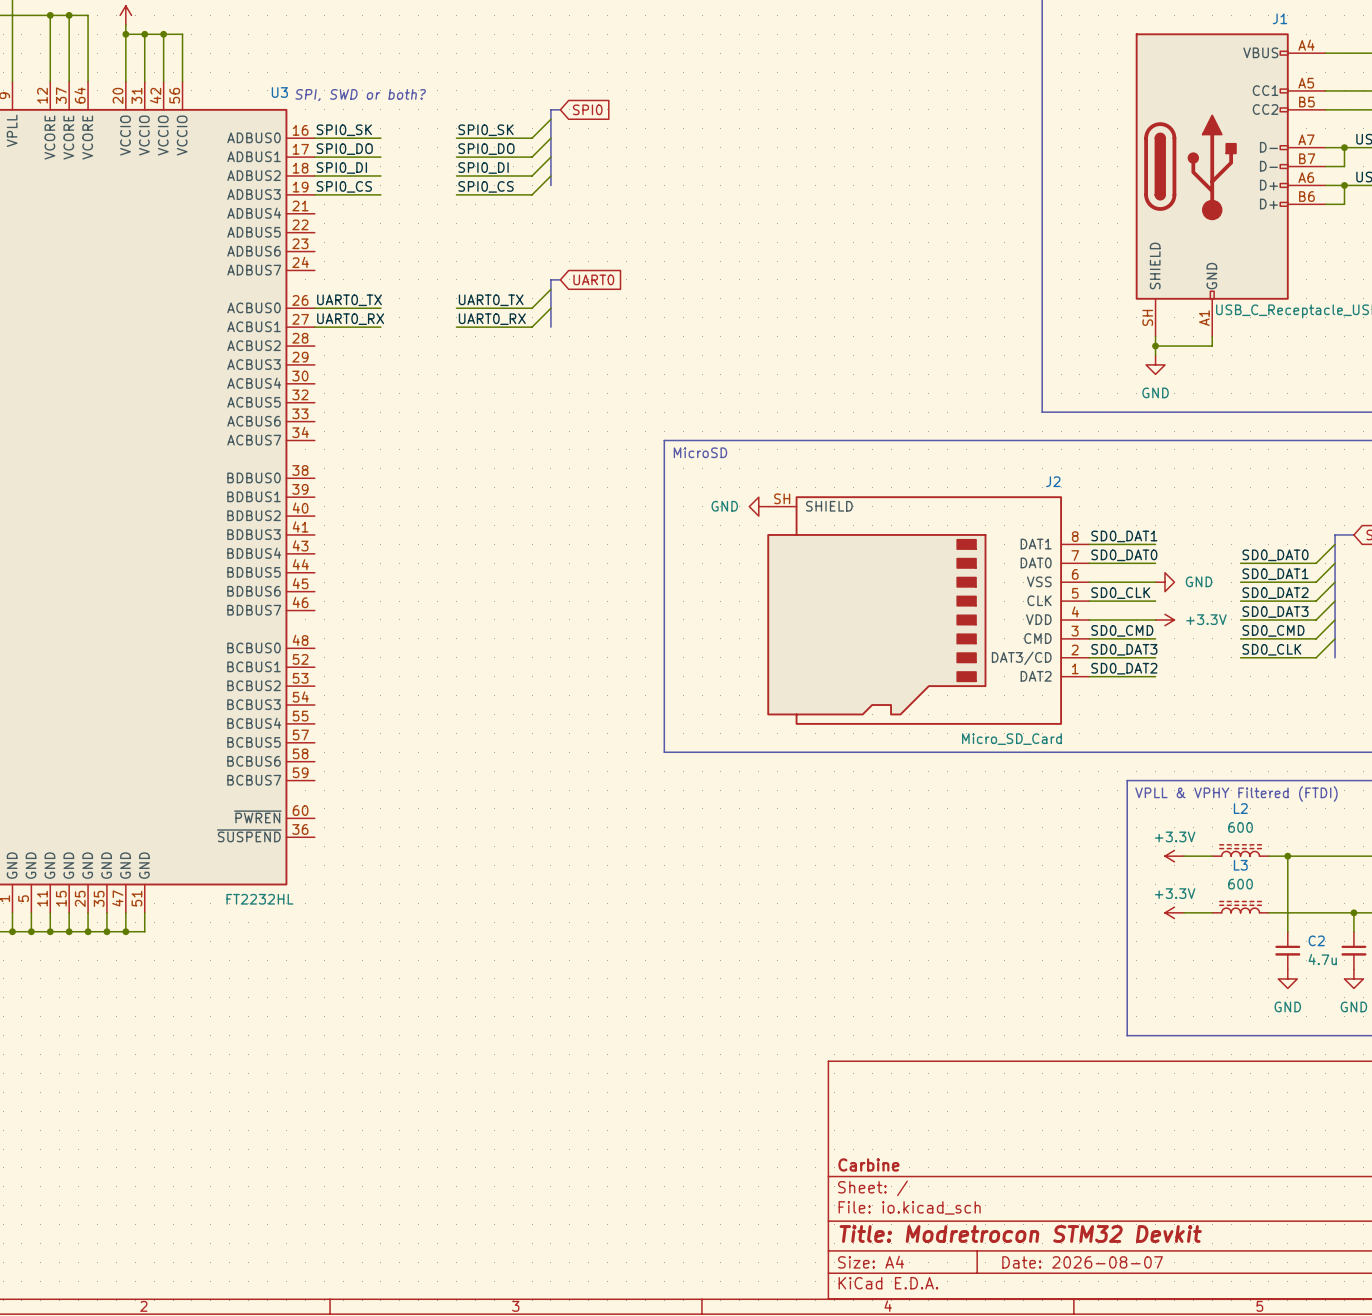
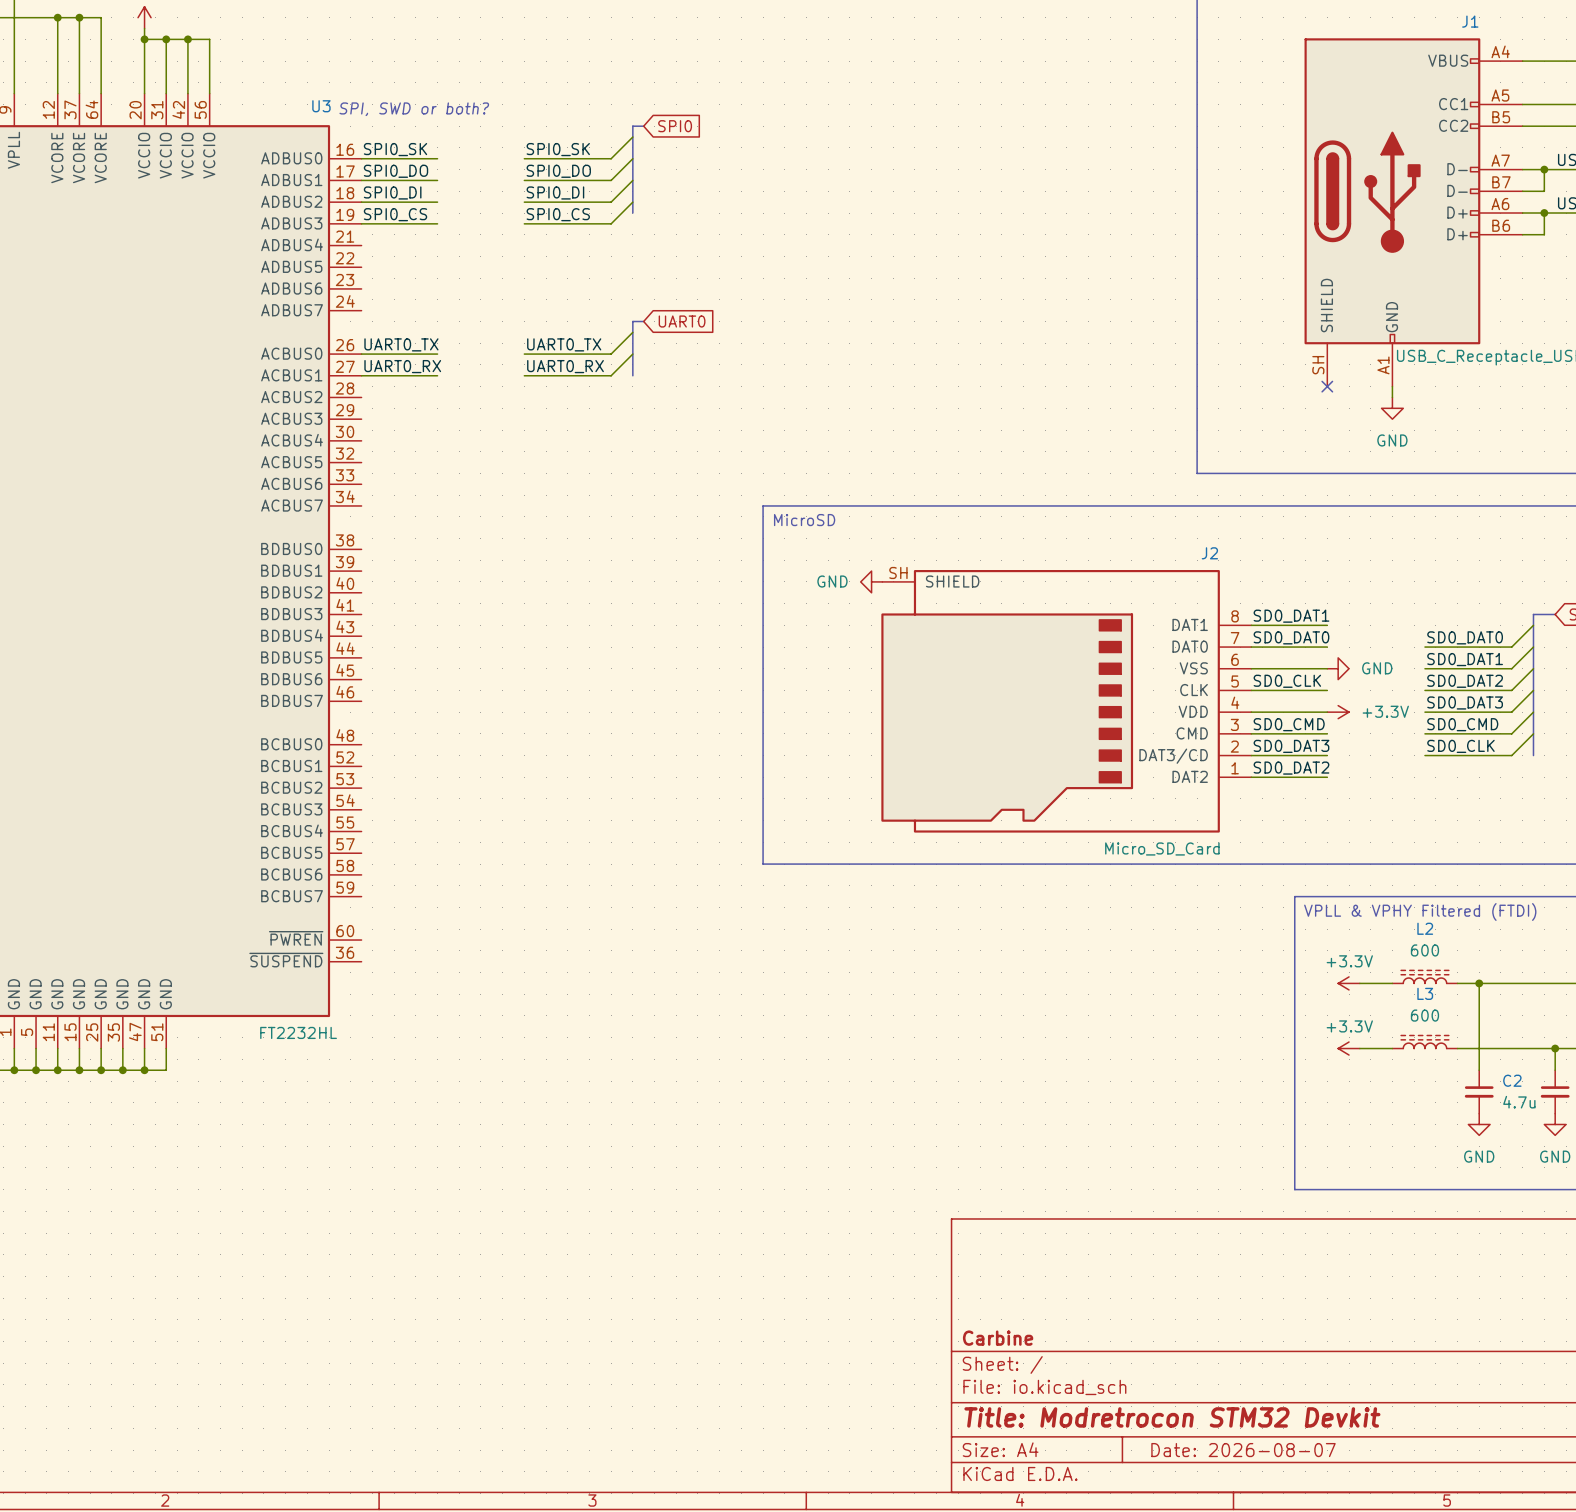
wire: (1155, 336) (1155, 355) -> none
no-connect mark: none -> (1327, 386)
wire: (1155, 346) (1212, 346) -> none
junction: (1155, 346) -> none
power symbol position: GND (1155, 364) -> GND (1392, 408)

